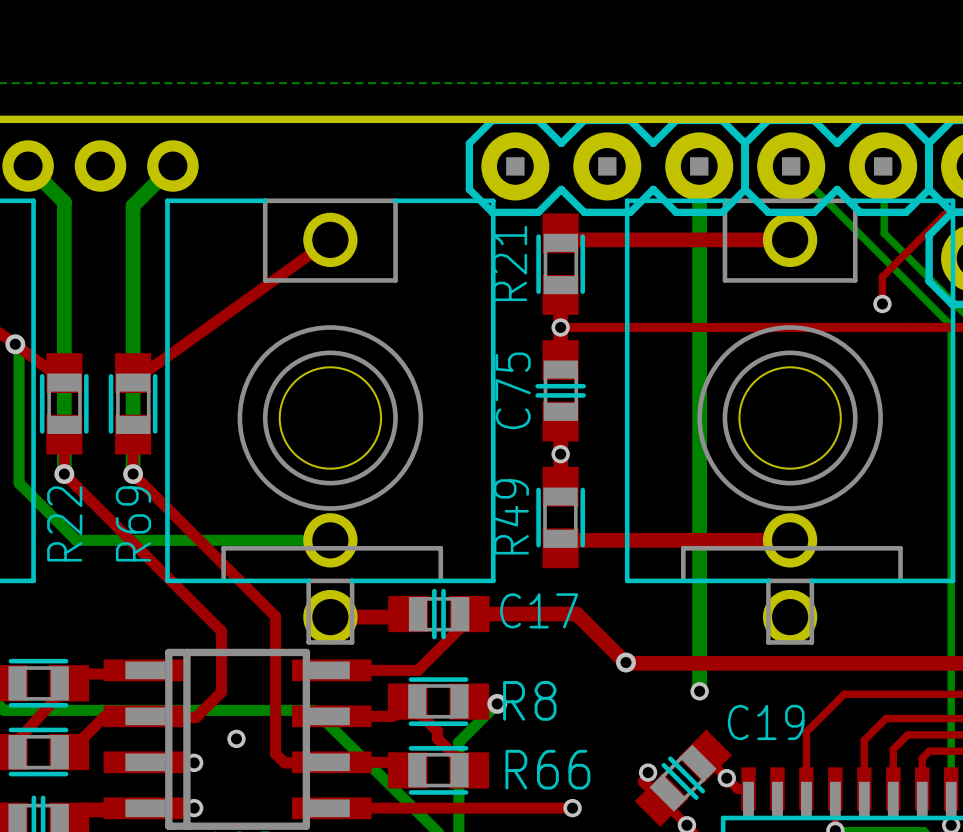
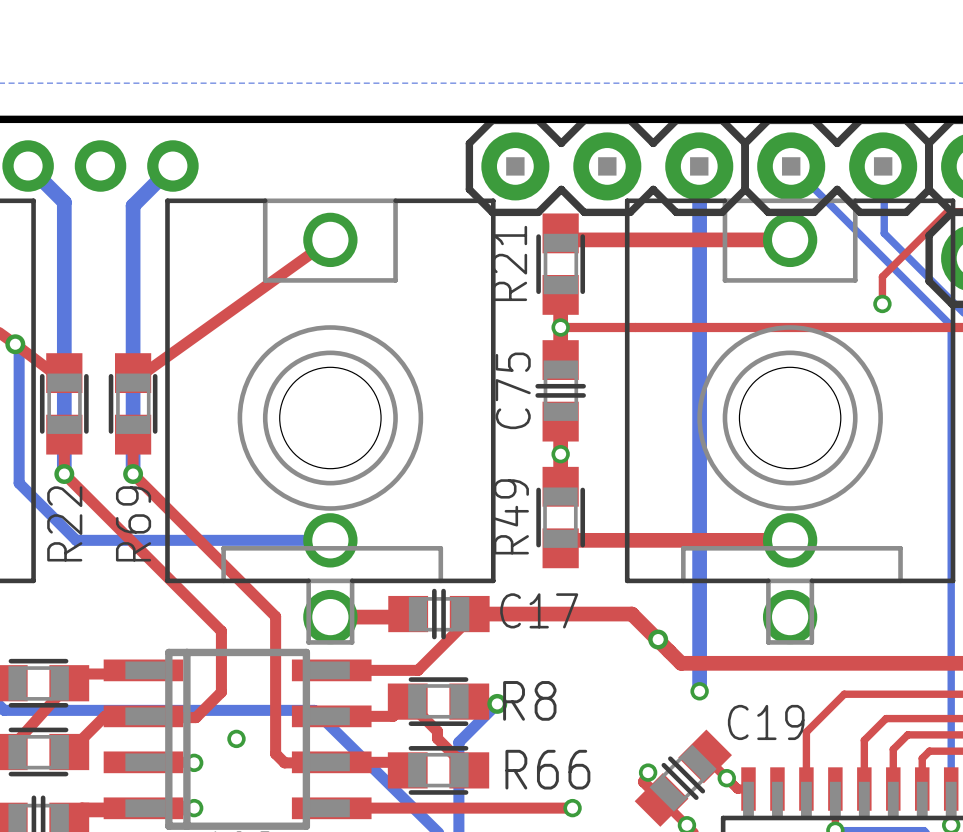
top track: (576, 614) (625, 663) (681, 663) -> (576, 614) (631, 614) (681, 663)
via position: (625, 662) -> (658, 639)

